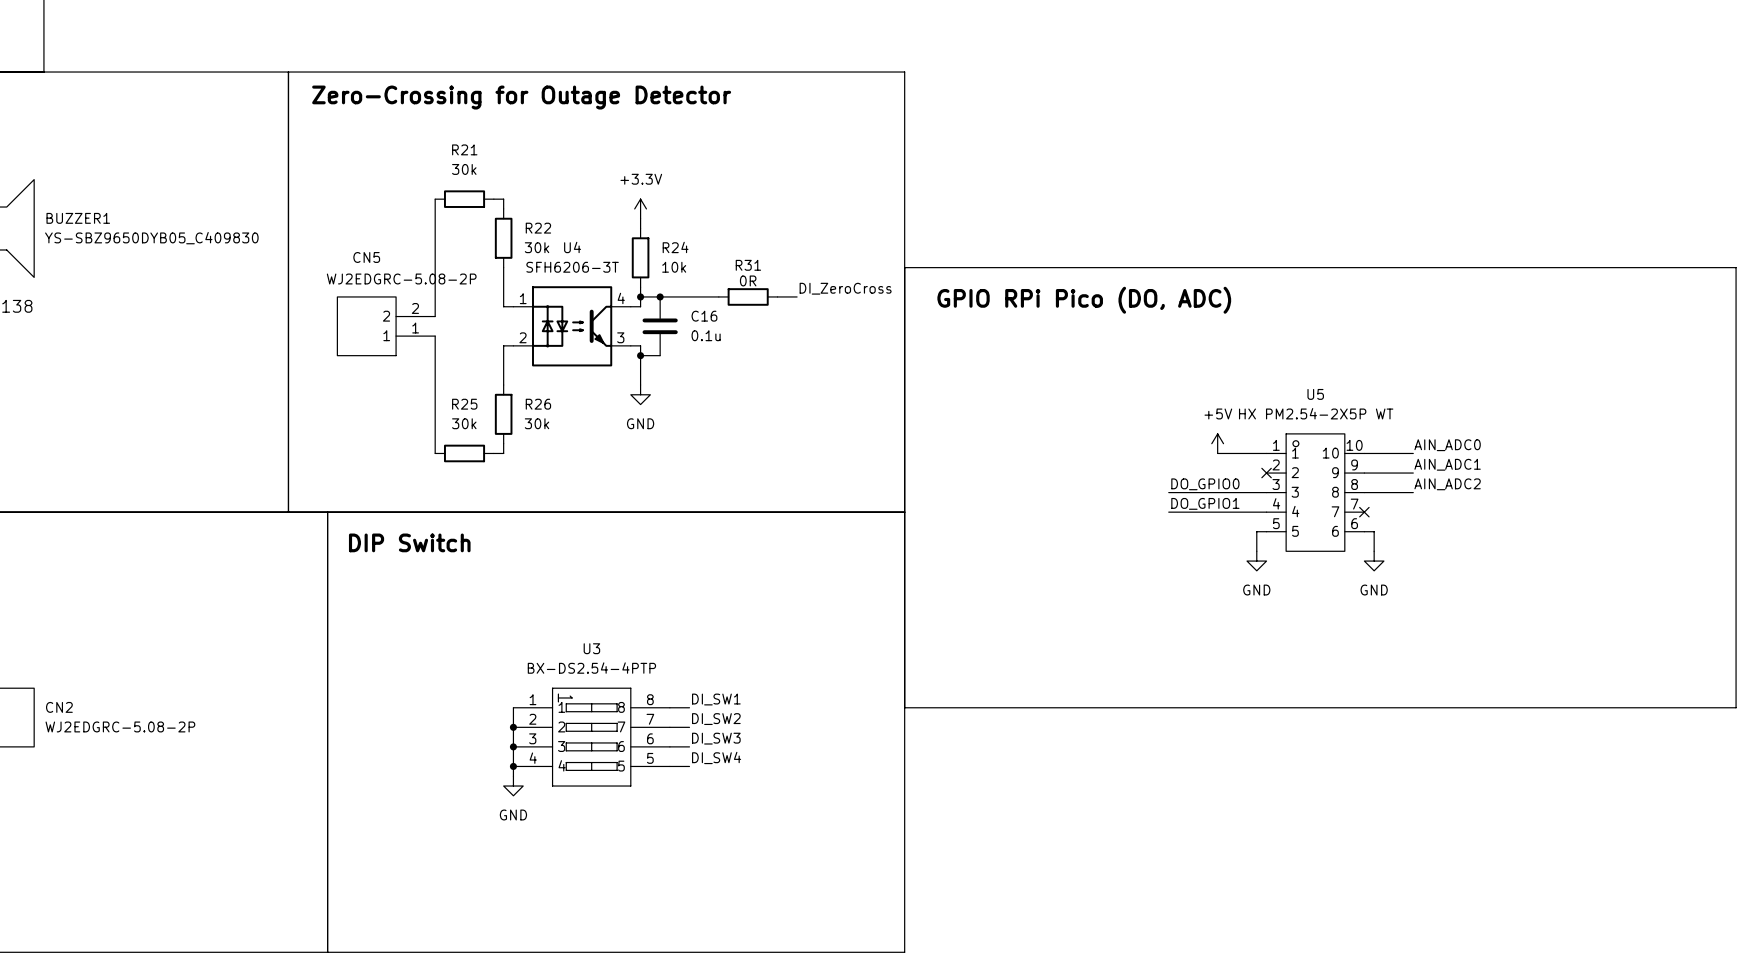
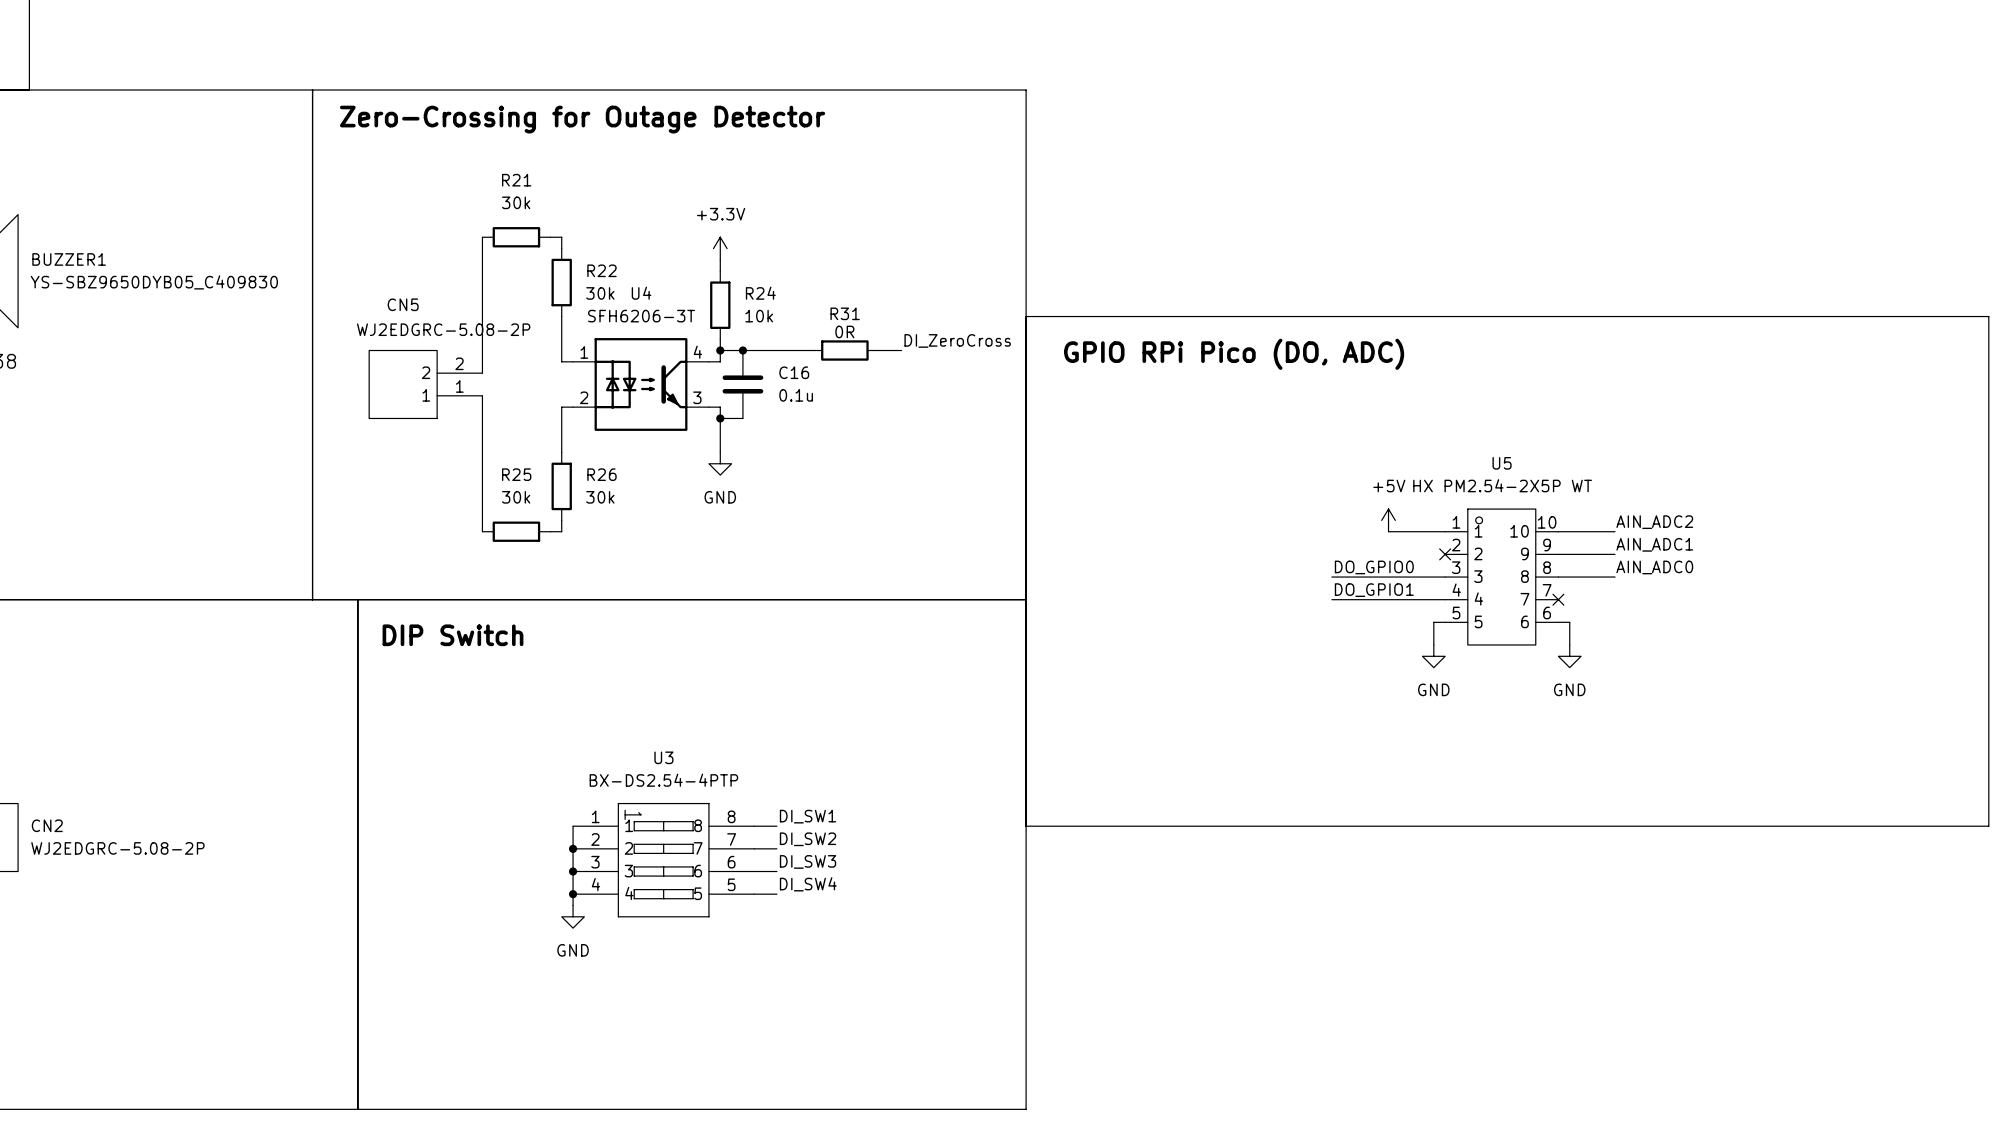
label: AIN_ADC0 (1447, 445) -> AIN_ADC2 (1654, 522)
label: AIN_ADC2 (1447, 484) -> AIN_ADC0 (1654, 567)

